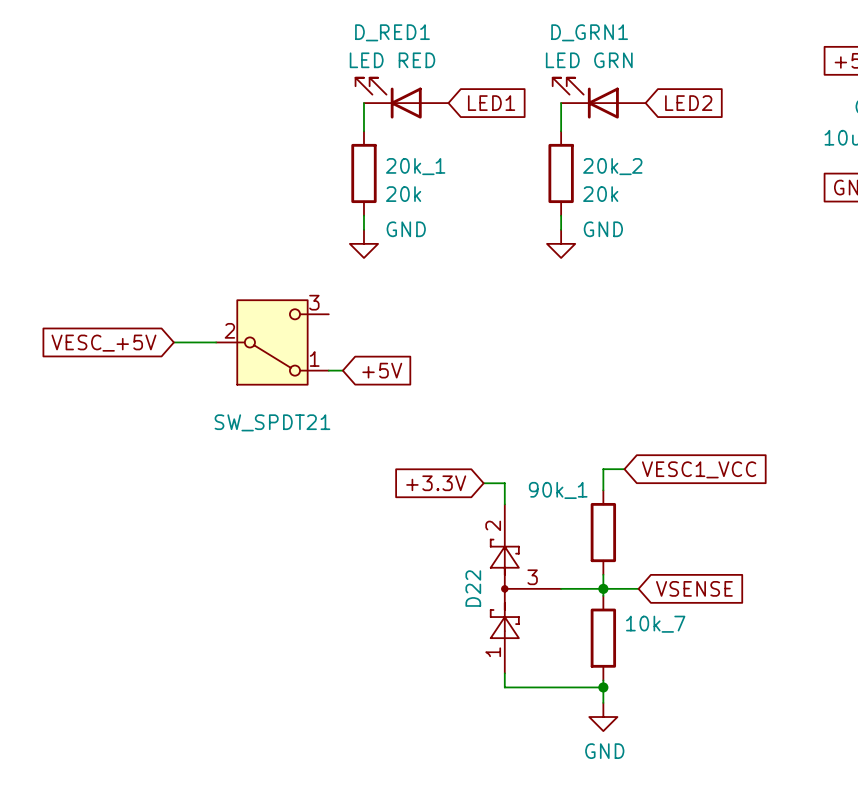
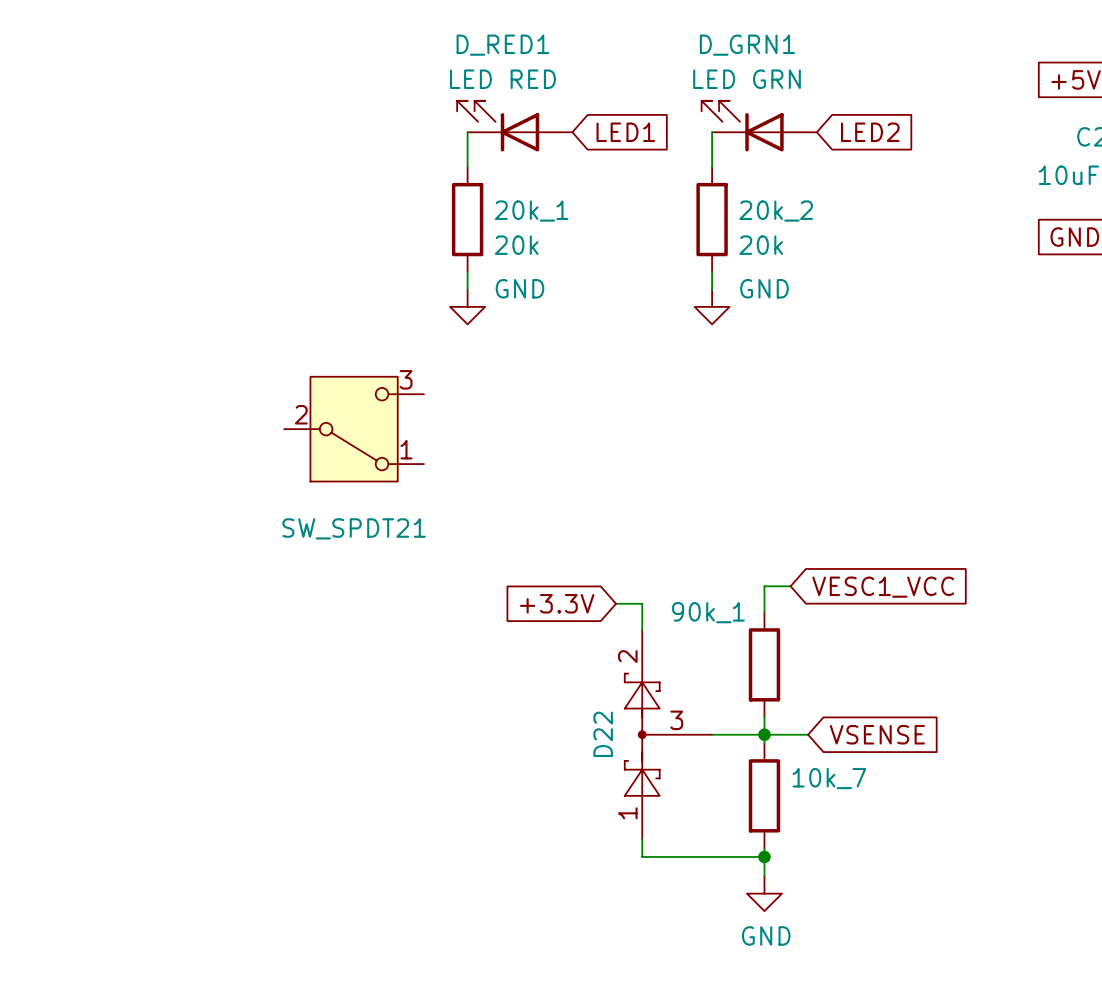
wire: (173, 342) (216, 342) -> none
global label: VESC_+5V (103, 343) -> none
wire: (328, 370) (342, 370) -> none
global label: +5V (382, 370) -> none

